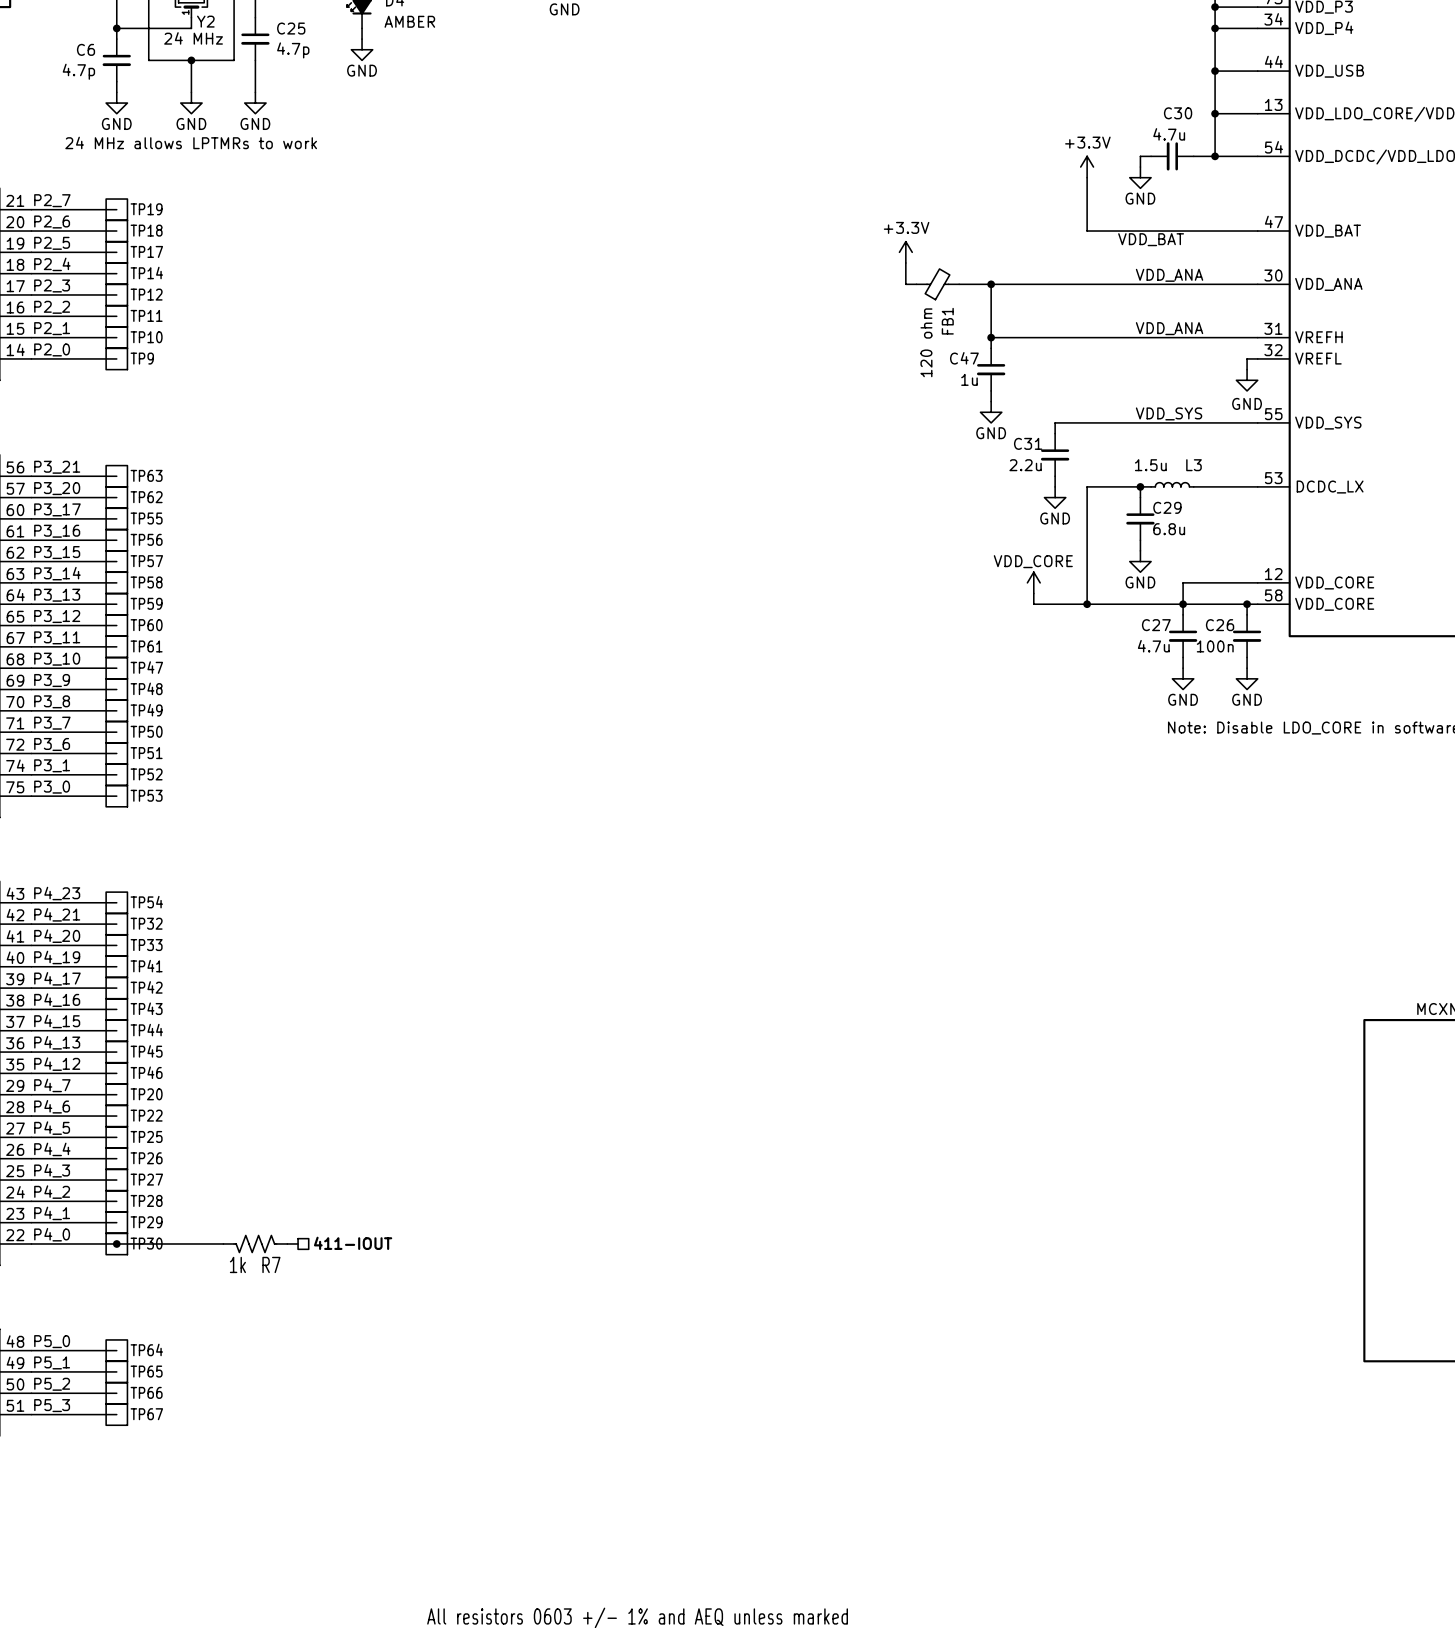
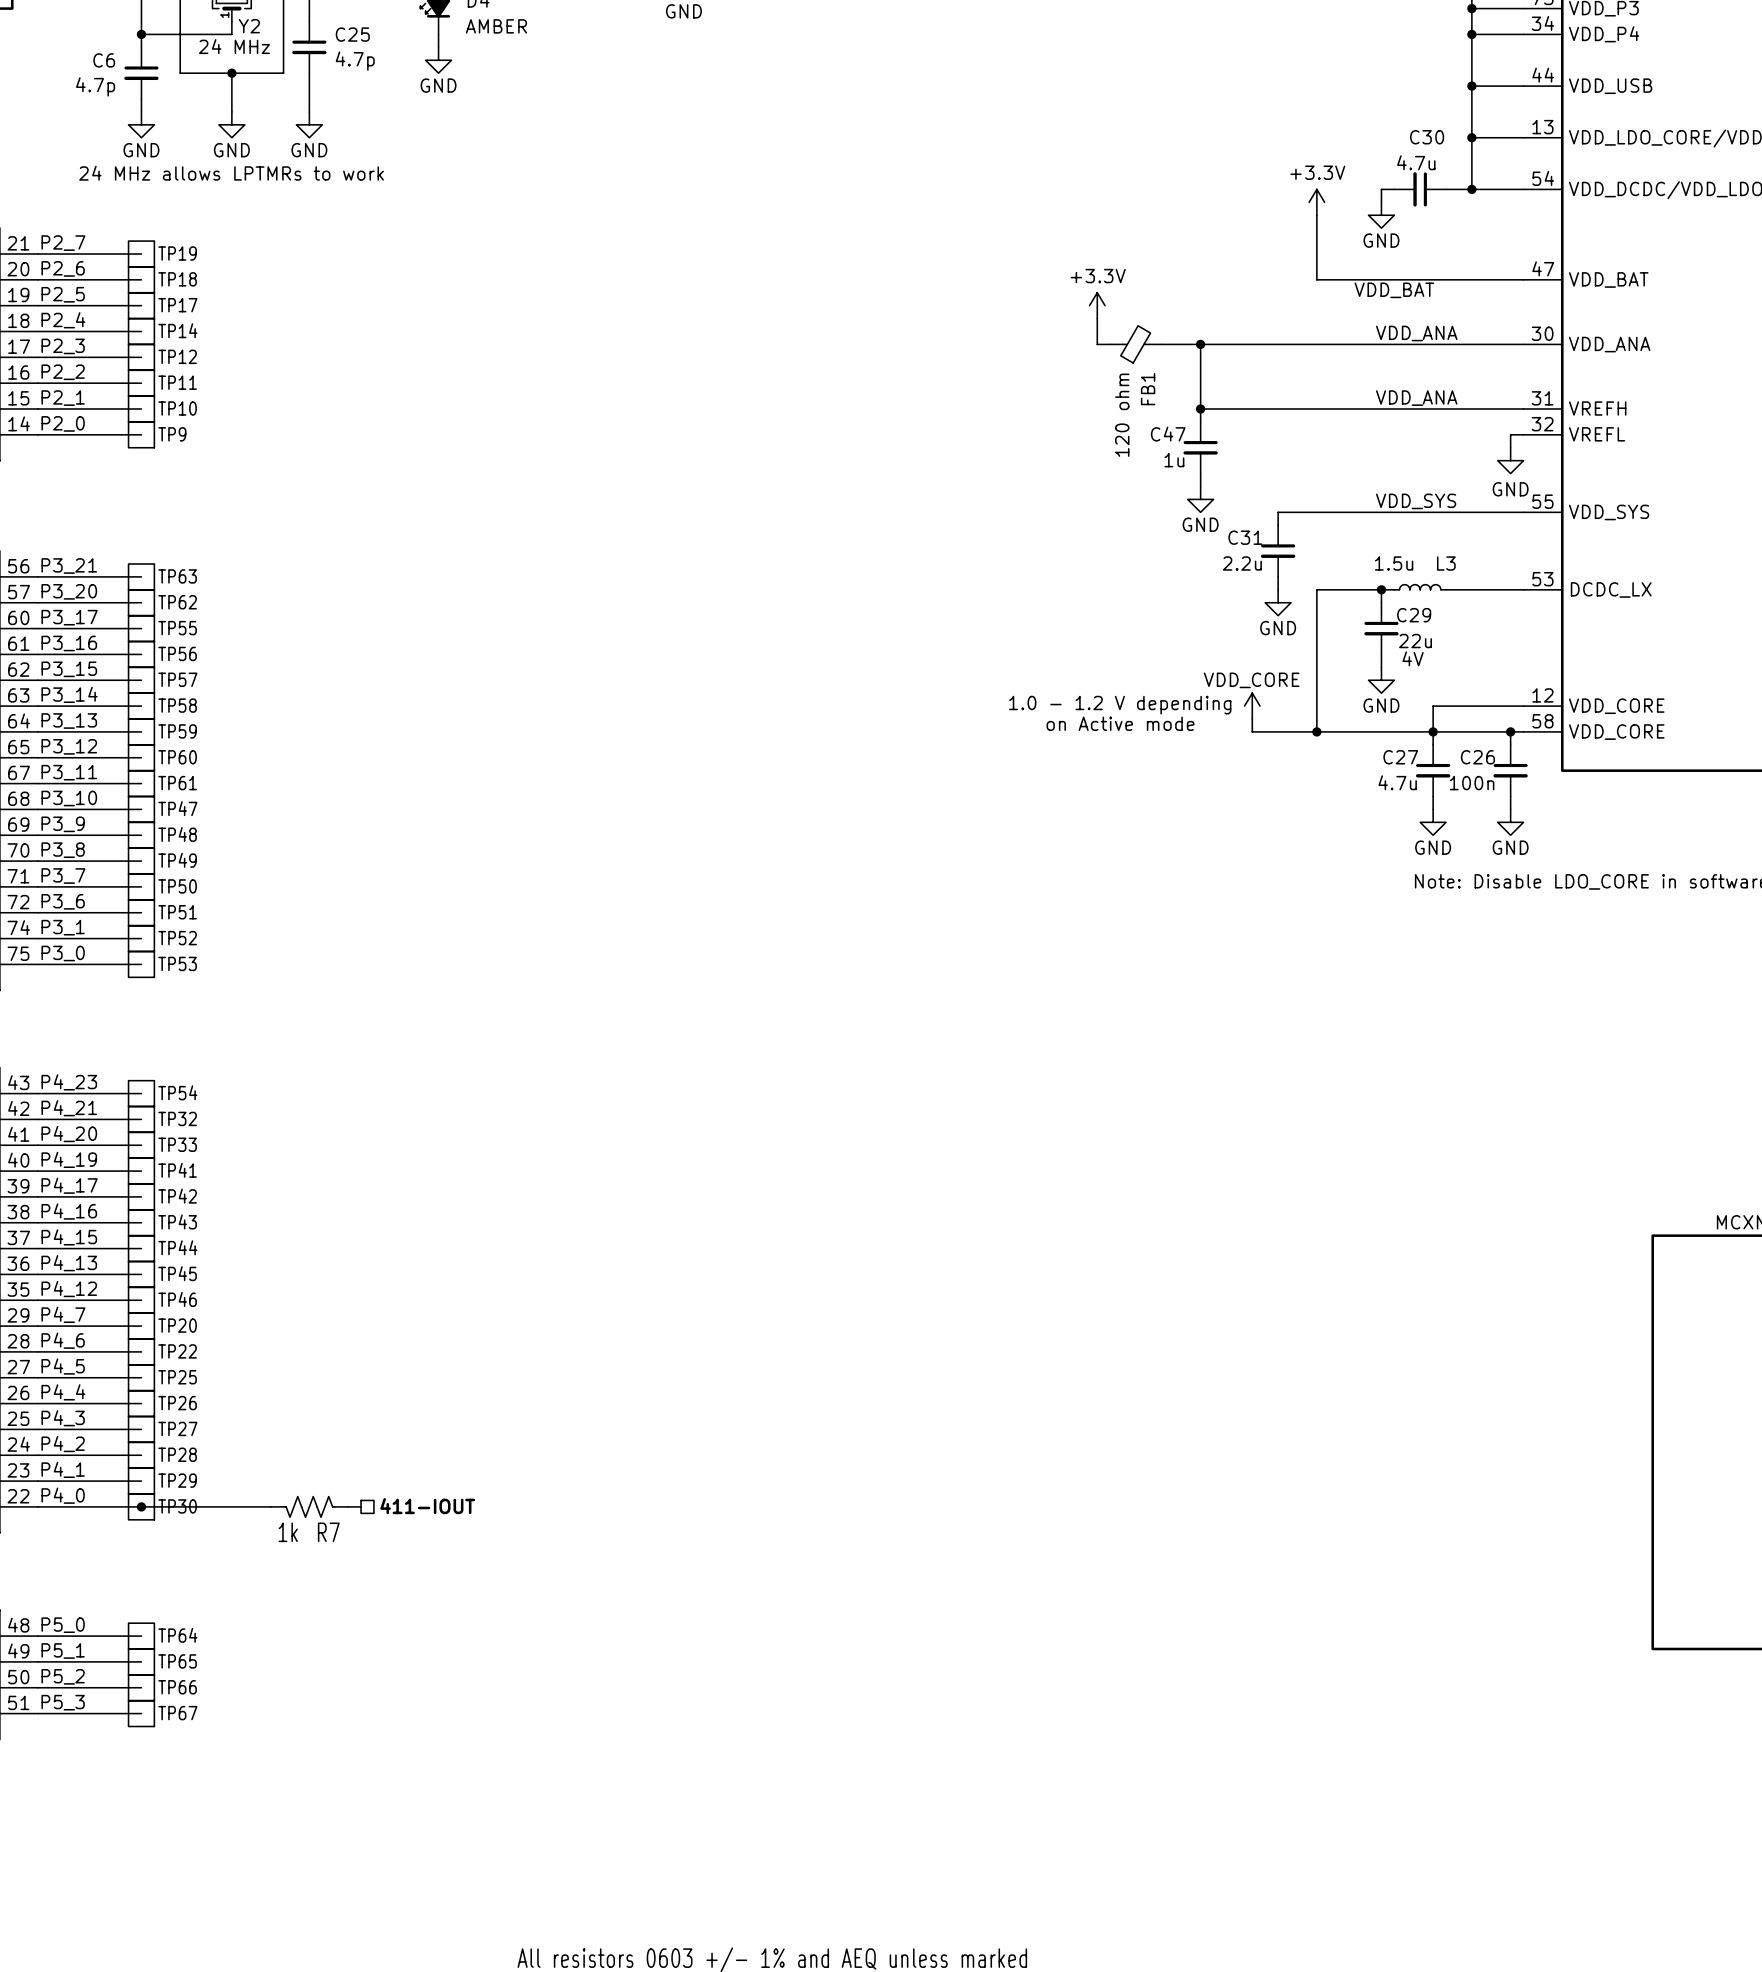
C29 value: 6.8u (1169, 529) -> 22u (1415, 641)
text: none -> 4V (1413, 658)
text: none -> 1.0 - 1.2 V depending (1120, 705)
text: none -> on Active mode (1120, 723)

